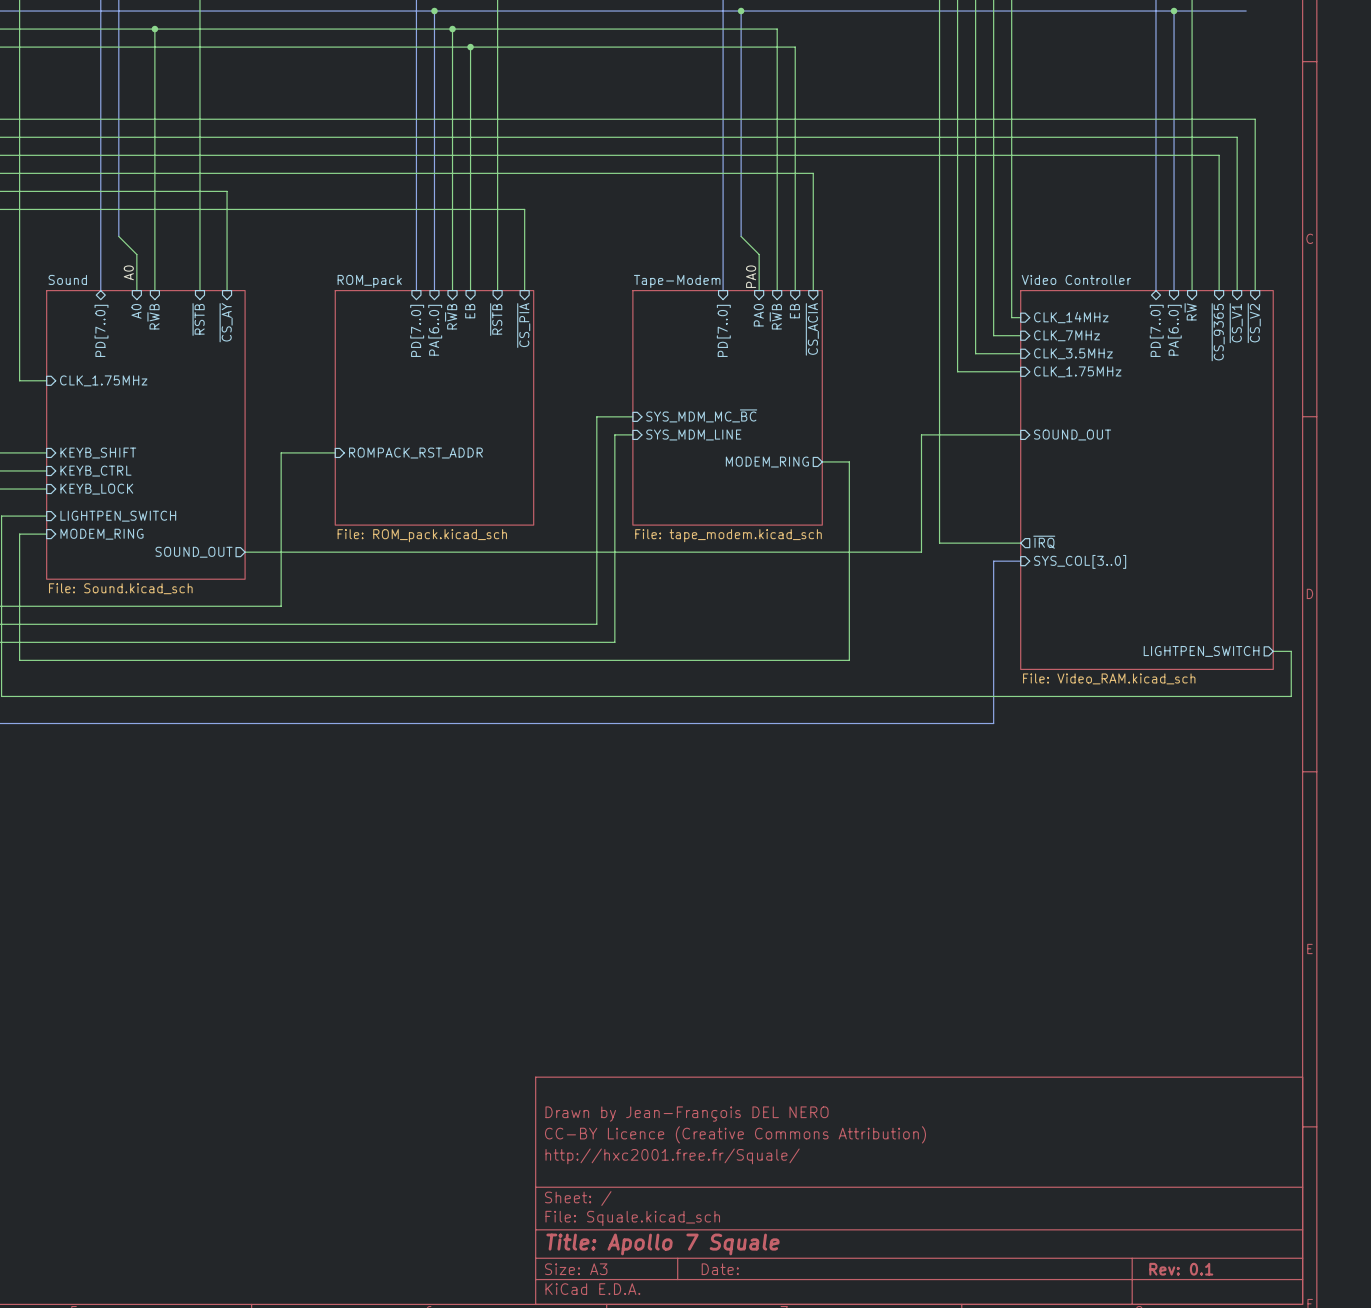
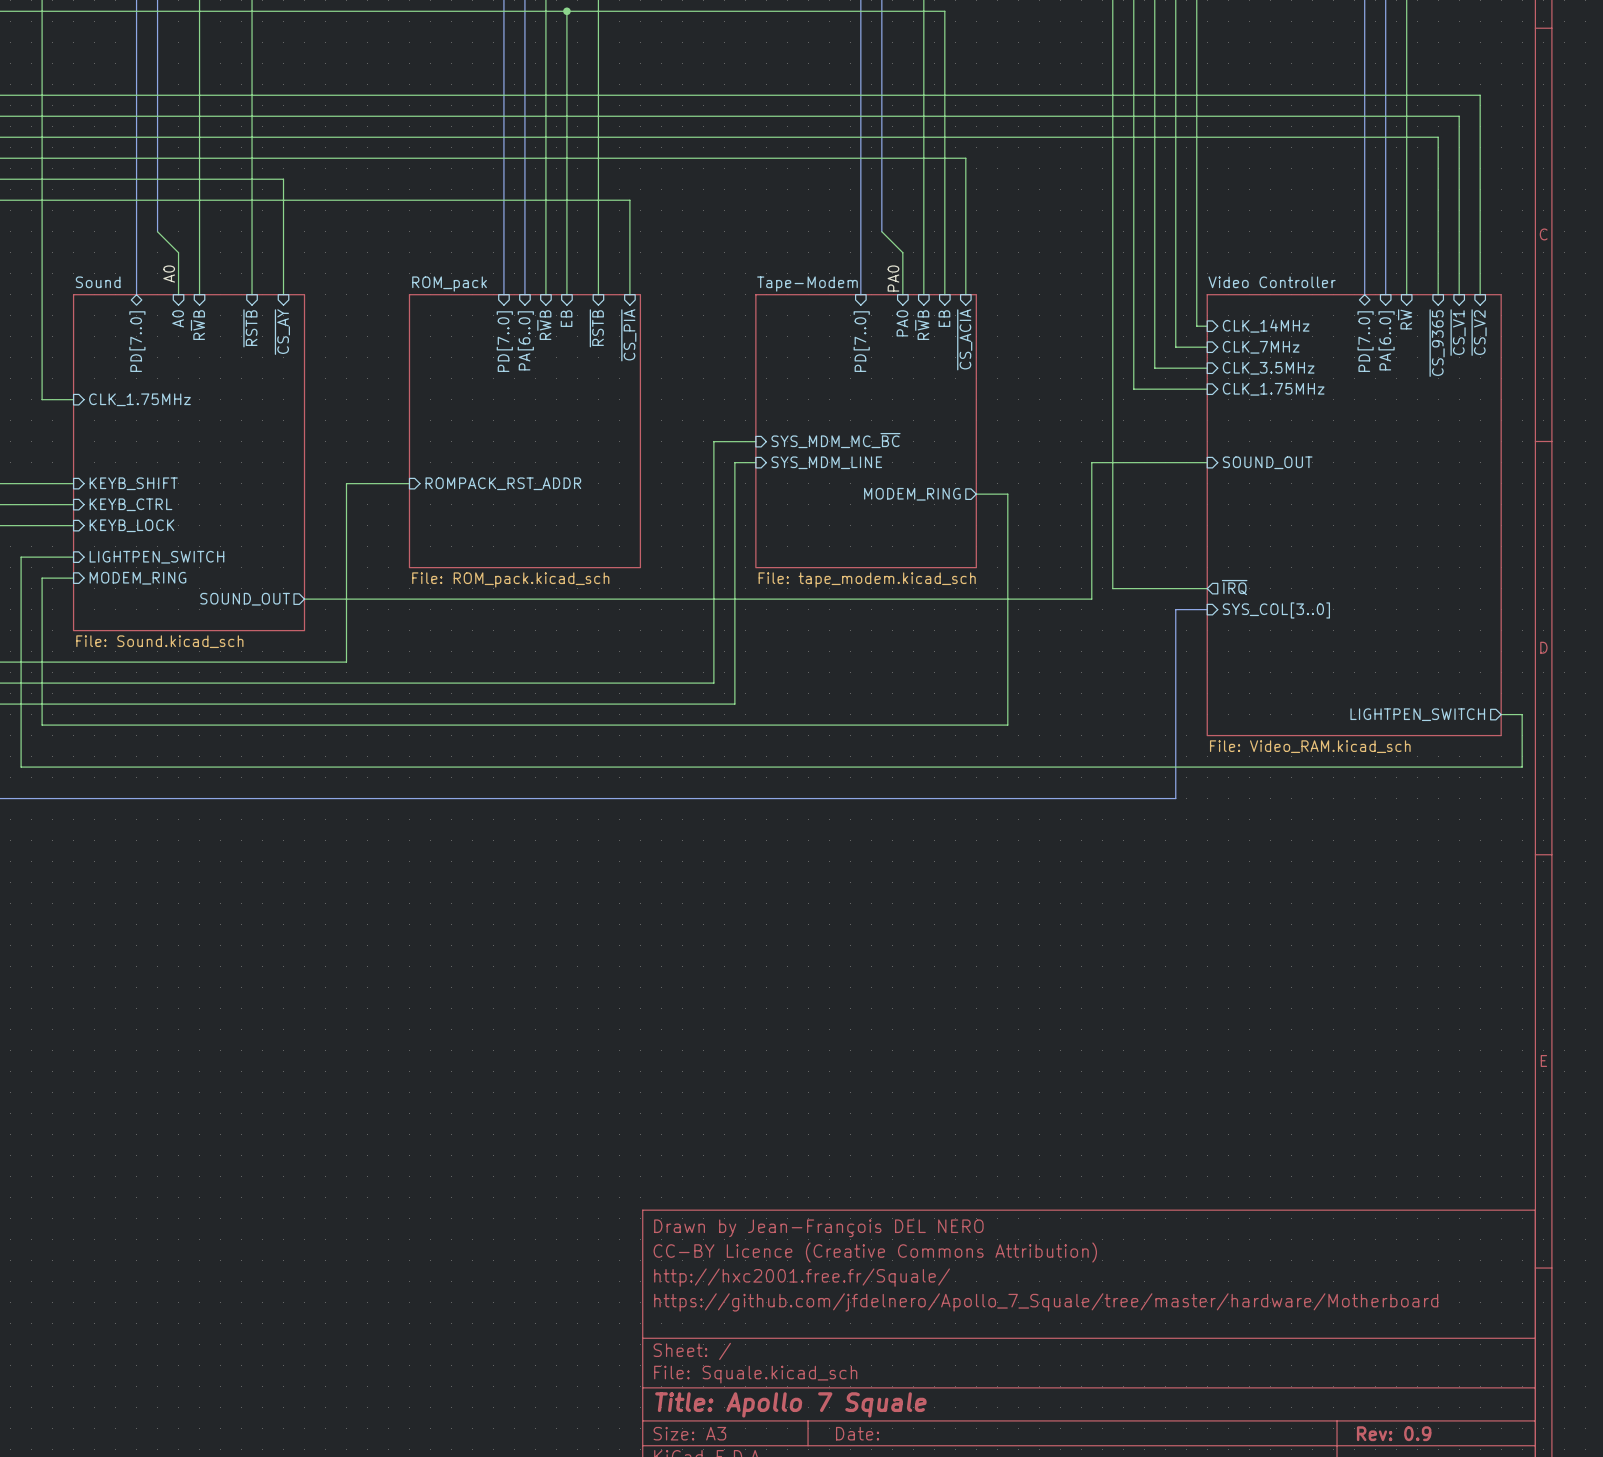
title block: none -> Drawn by Jean-François DEL NERO (818, 1228)
title block: Drawn by Jean-François DEL NERO (687, 1114) -> CC-BY Licence (Creative Commons Attribution) (875, 1252)
title block: CC-BY Licence (Creative Commons Attribution) (735, 1134) -> http://hxc2001.free.fr/Squale/ (802, 1277)
title block: http://hxc2001.free.fr/Squale/ (672, 1156) -> https://github.com/jfdelnero/Apollo_7_Squale/tree/master/hardware/Motherboard (1046, 1302)
title block: Rev: 0.1 (1181, 1269) -> Rev: 0.9 (1394, 1433)

